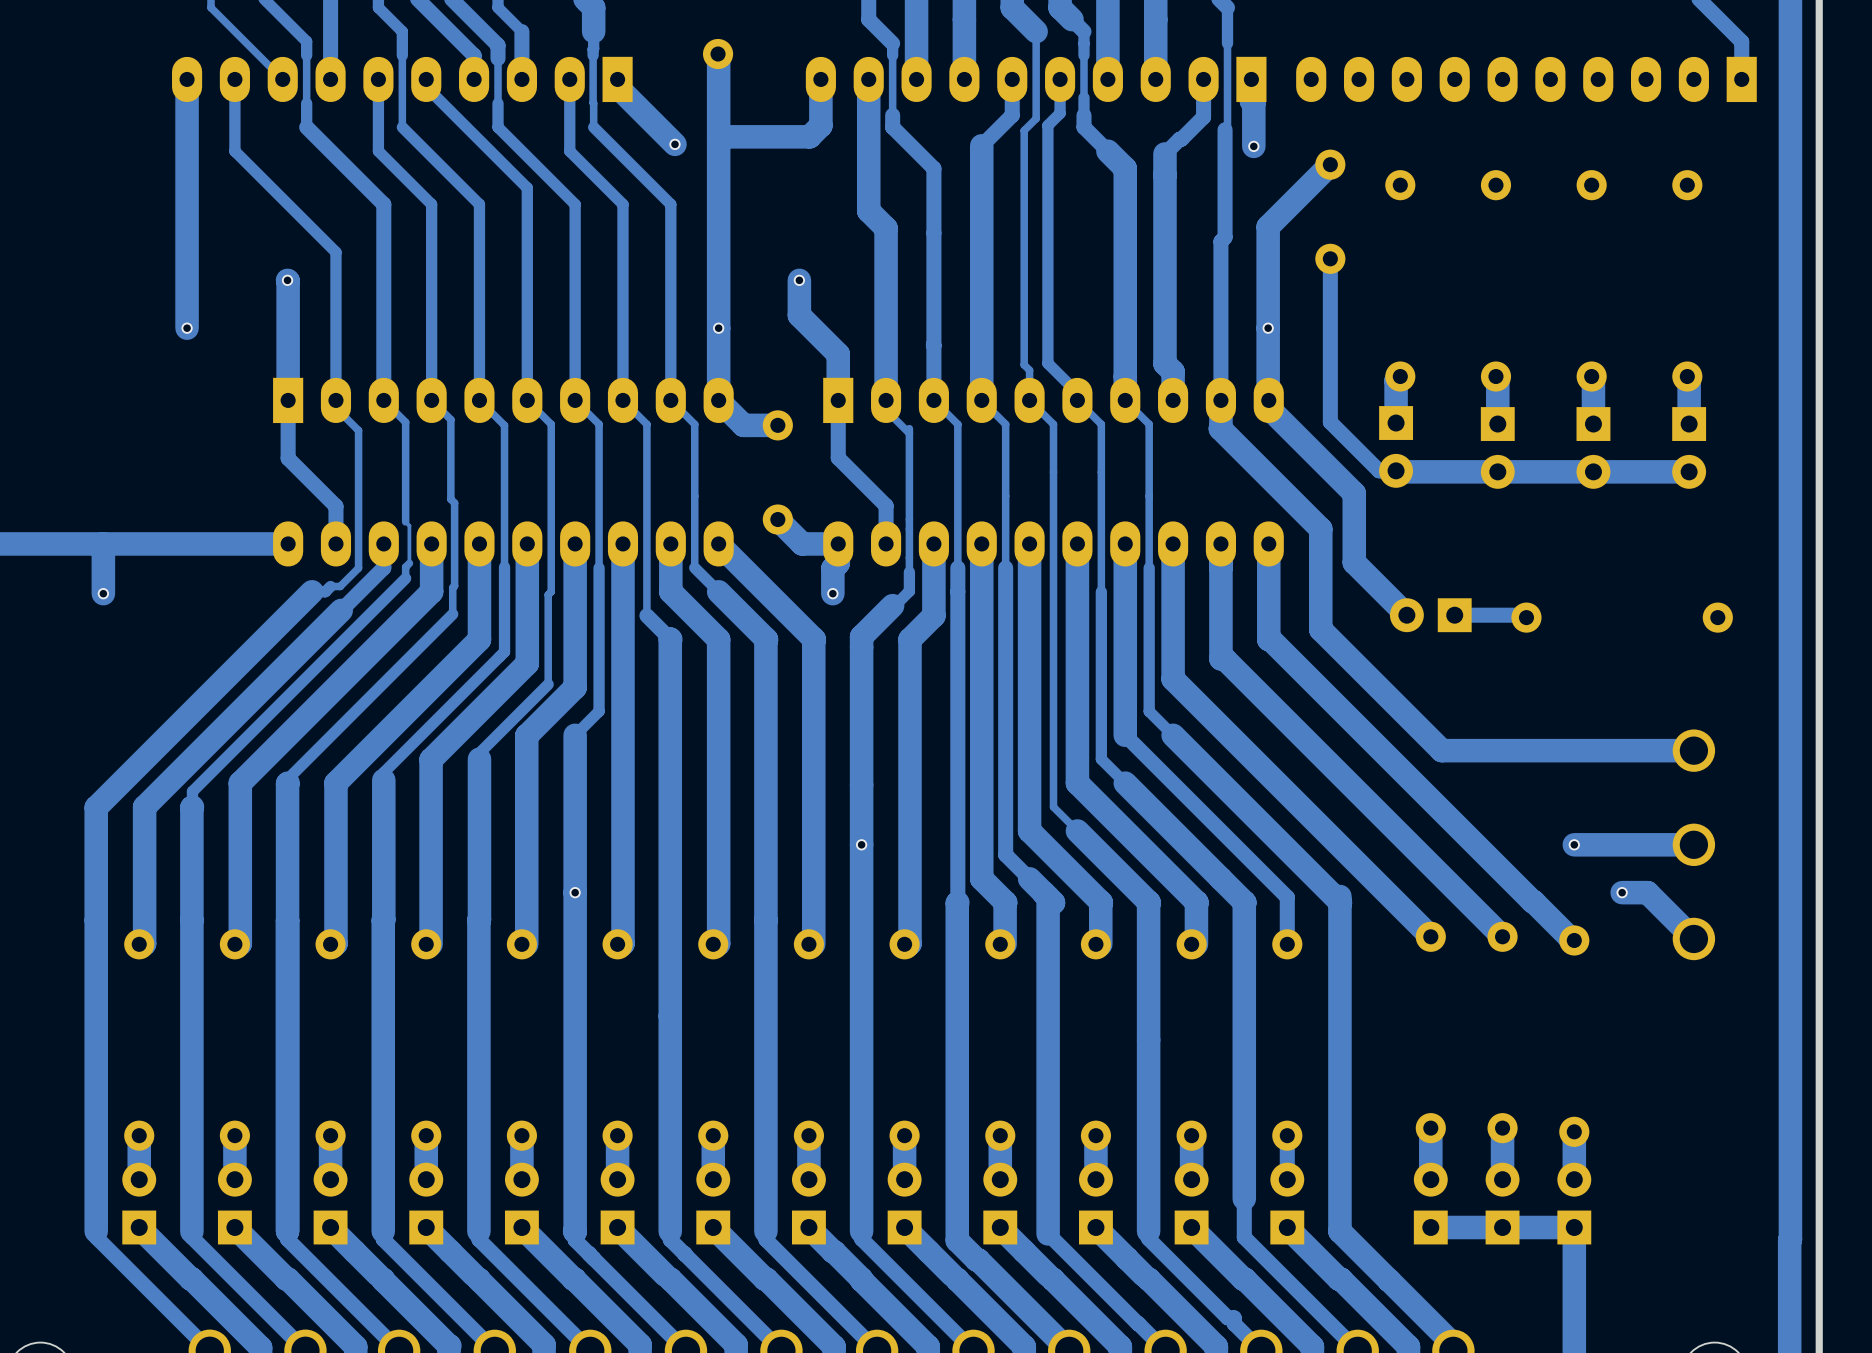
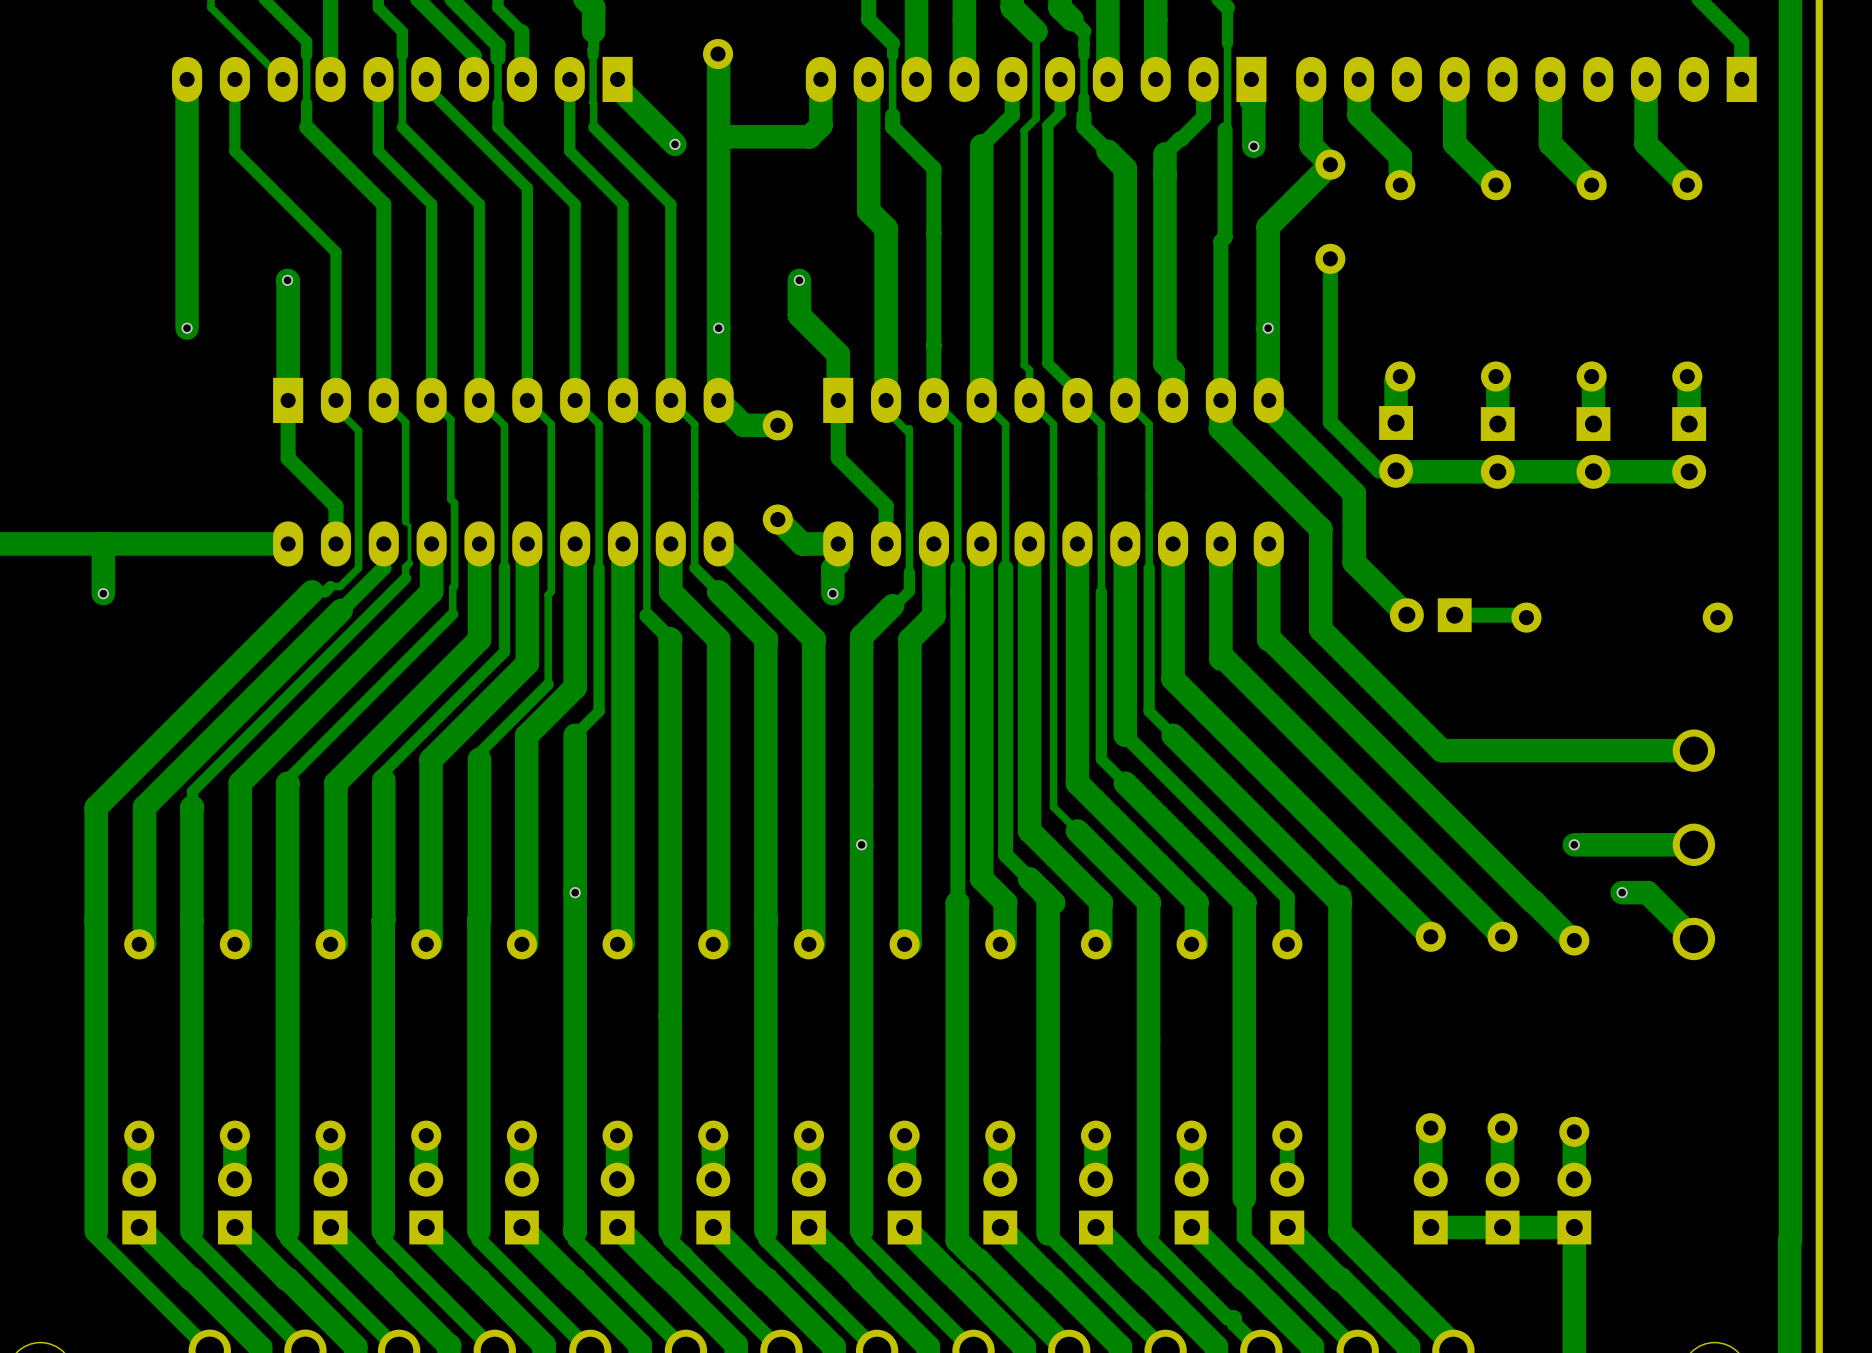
track: none -> (1311, 79) (1311, 145) (1330, 164)
track: none -> (1359, 79) (1359, 115) (1400, 156) (1400, 185)
track: none -> (1454, 79) (1454, 143) (1495, 185)
track: none -> (1550, 79) (1550, 143) (1591, 185)
track: none -> (1646, 79) (1646, 143) (1687, 185)

